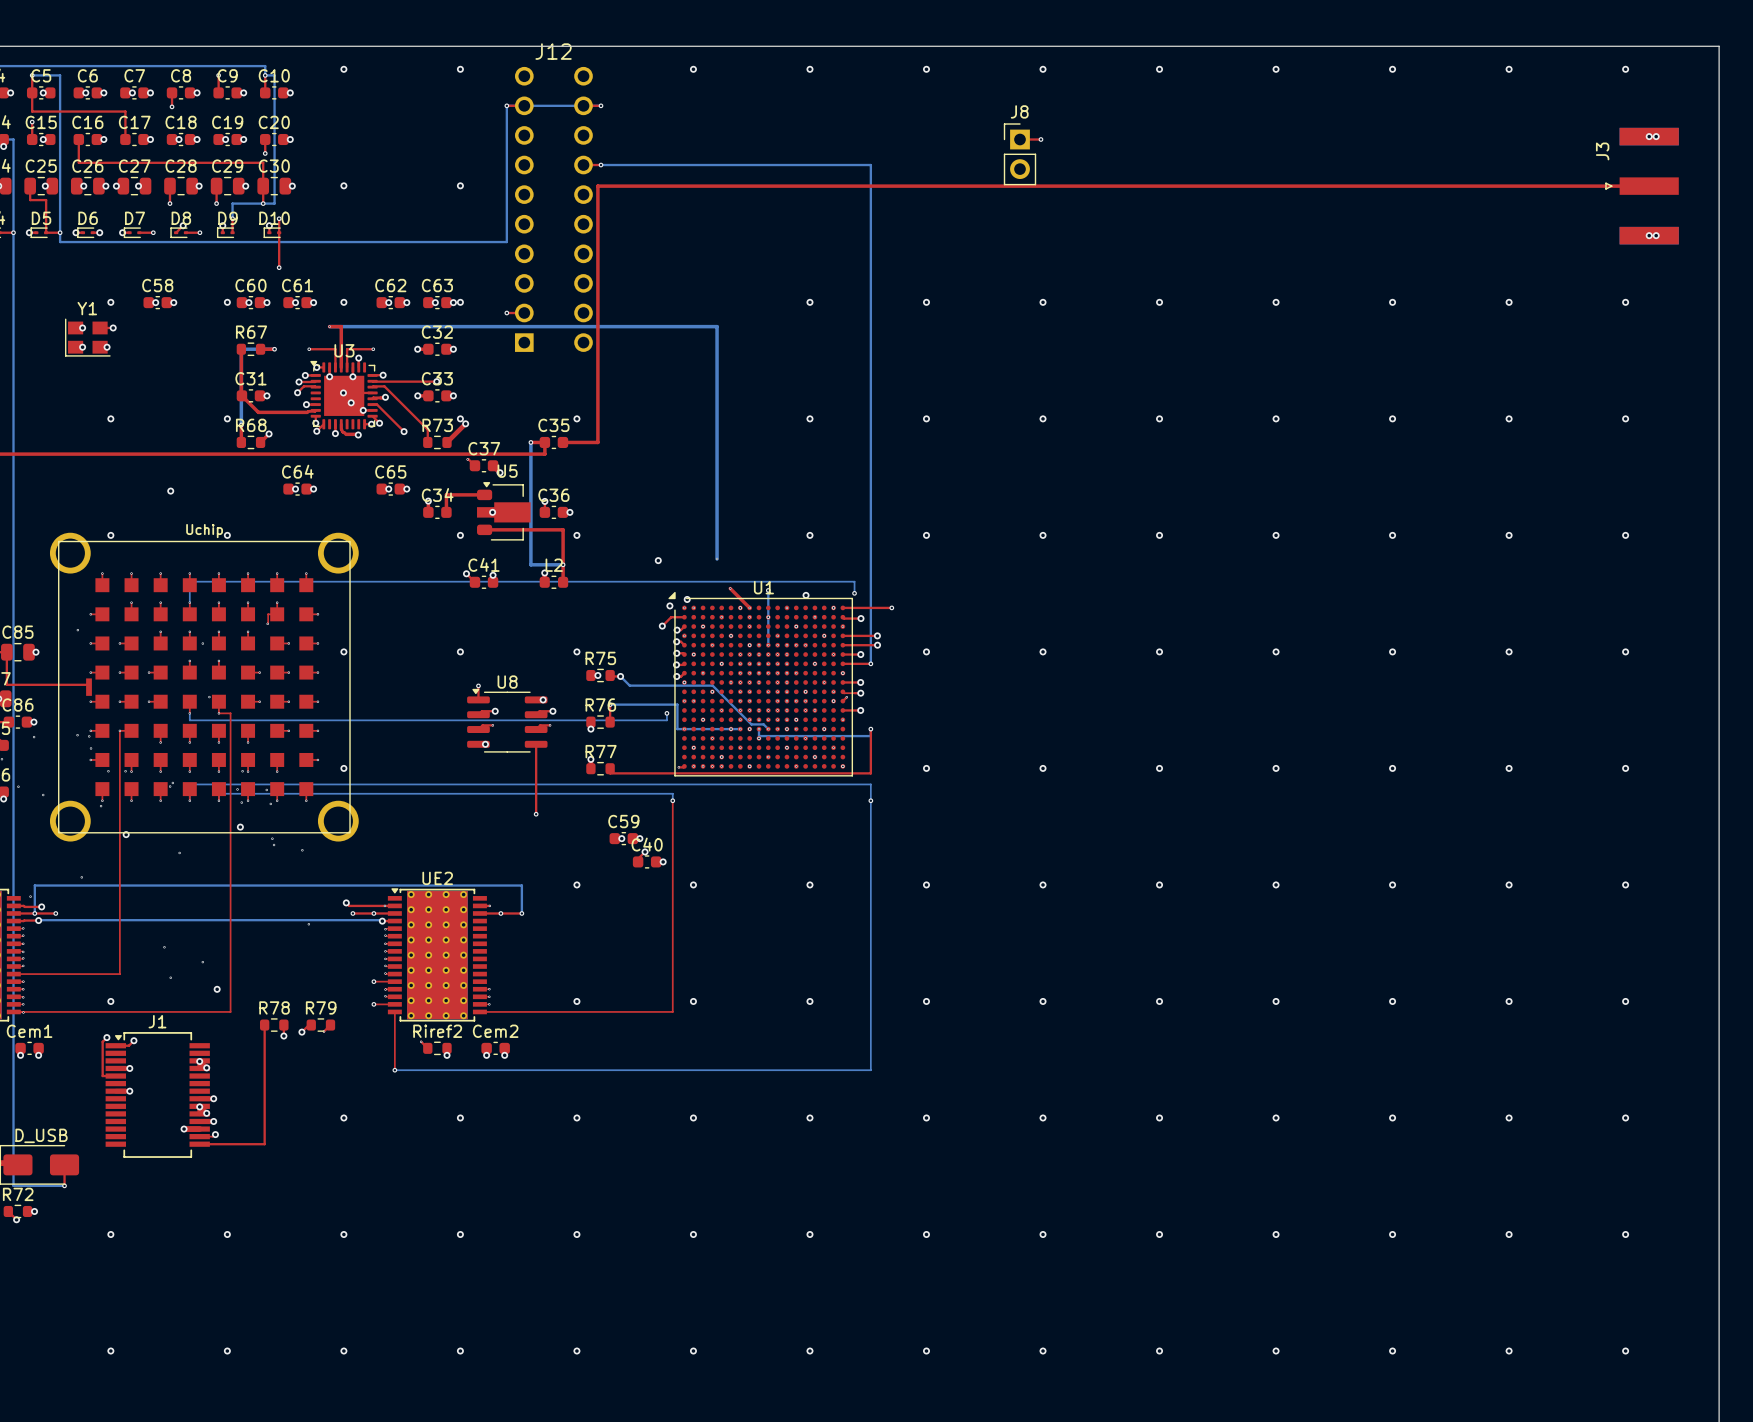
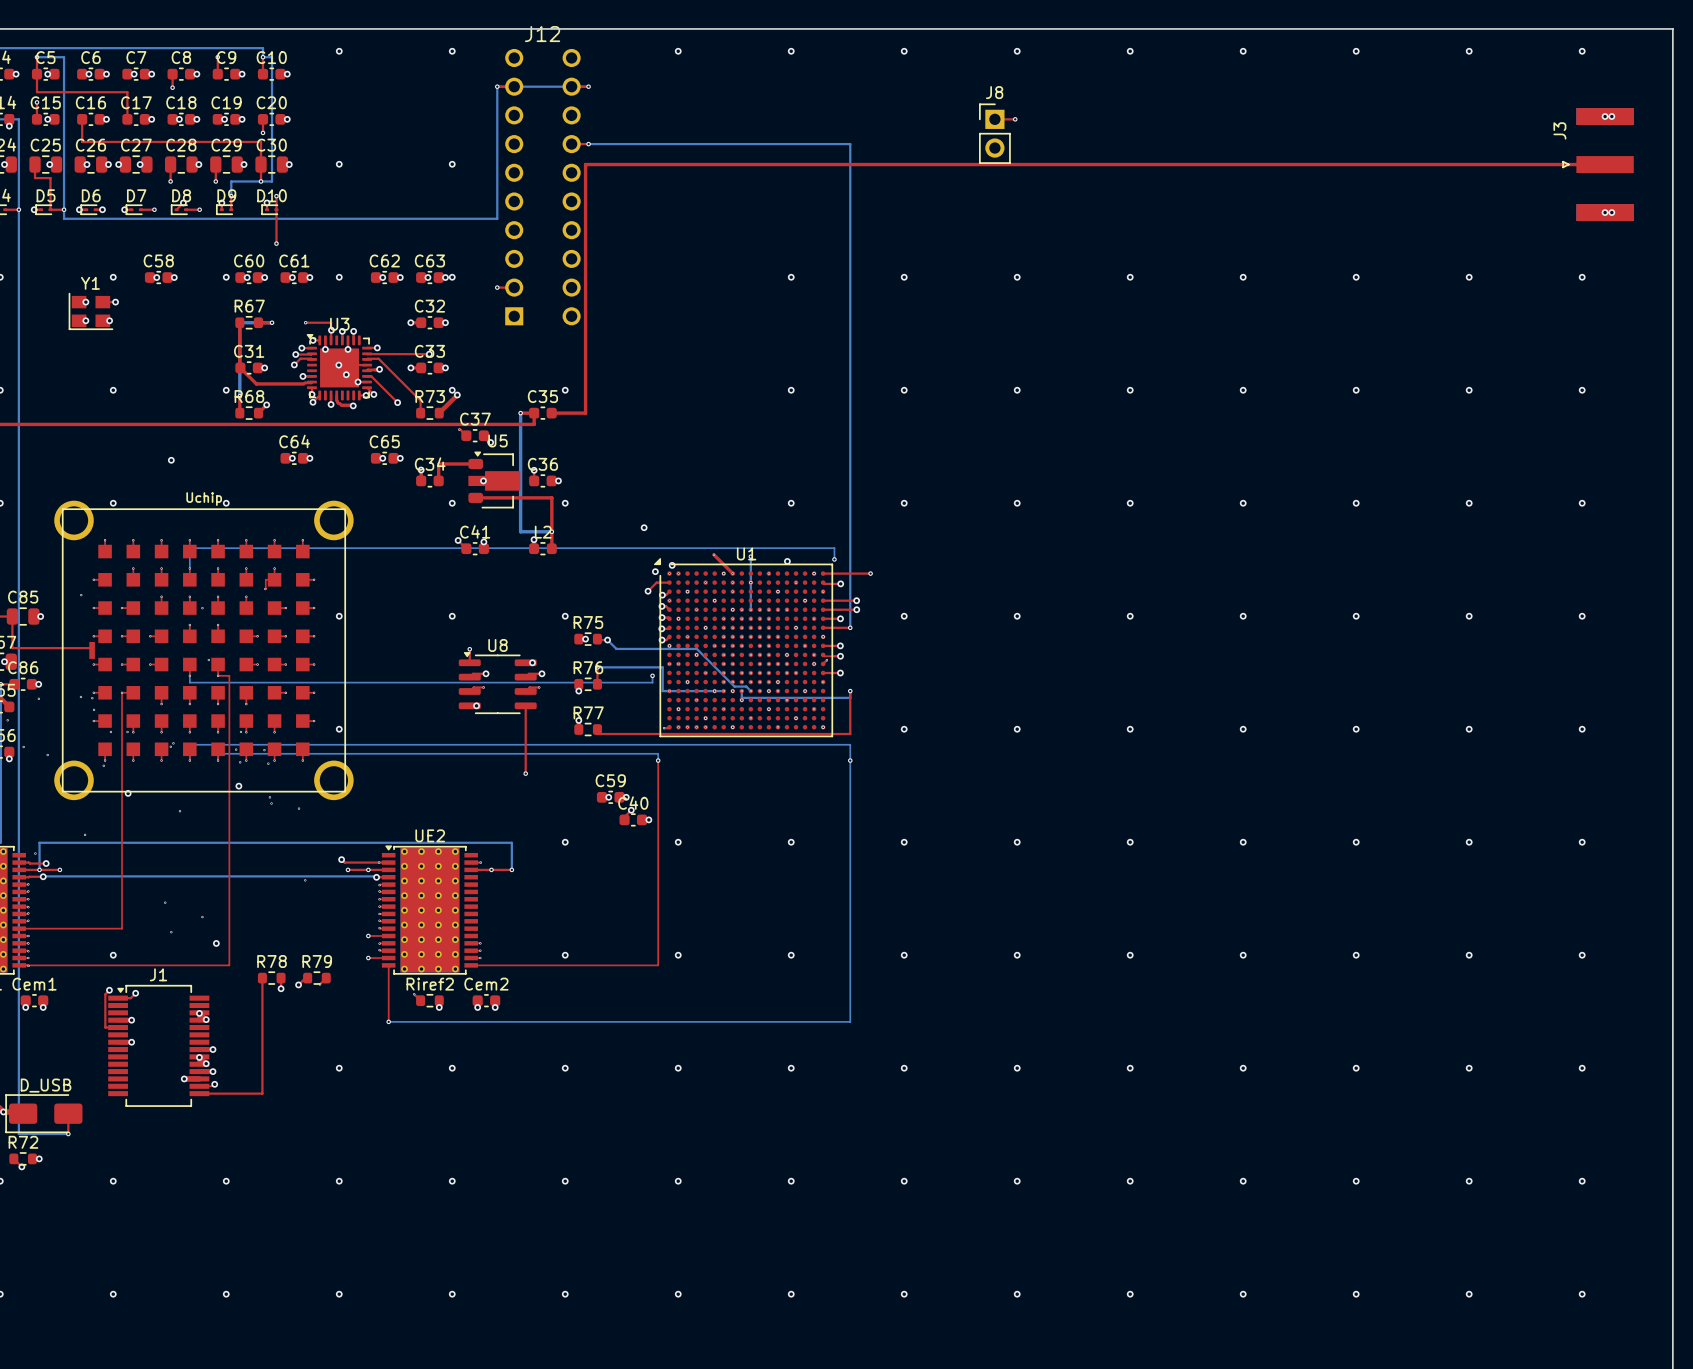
top track: (329, 326) (341, 326) (341, 367) -> none
bottom track: (329, 326) (717, 326) (717, 558) -> none
via: (329, 326) -> none
top track: (373, 349) (347, 349) (347, 358) -> none
via: (373, 349) -> none
via: none -> (331, 330)
via: none -> (342, 331)
via position: (717, 558) -> (732, 582)

